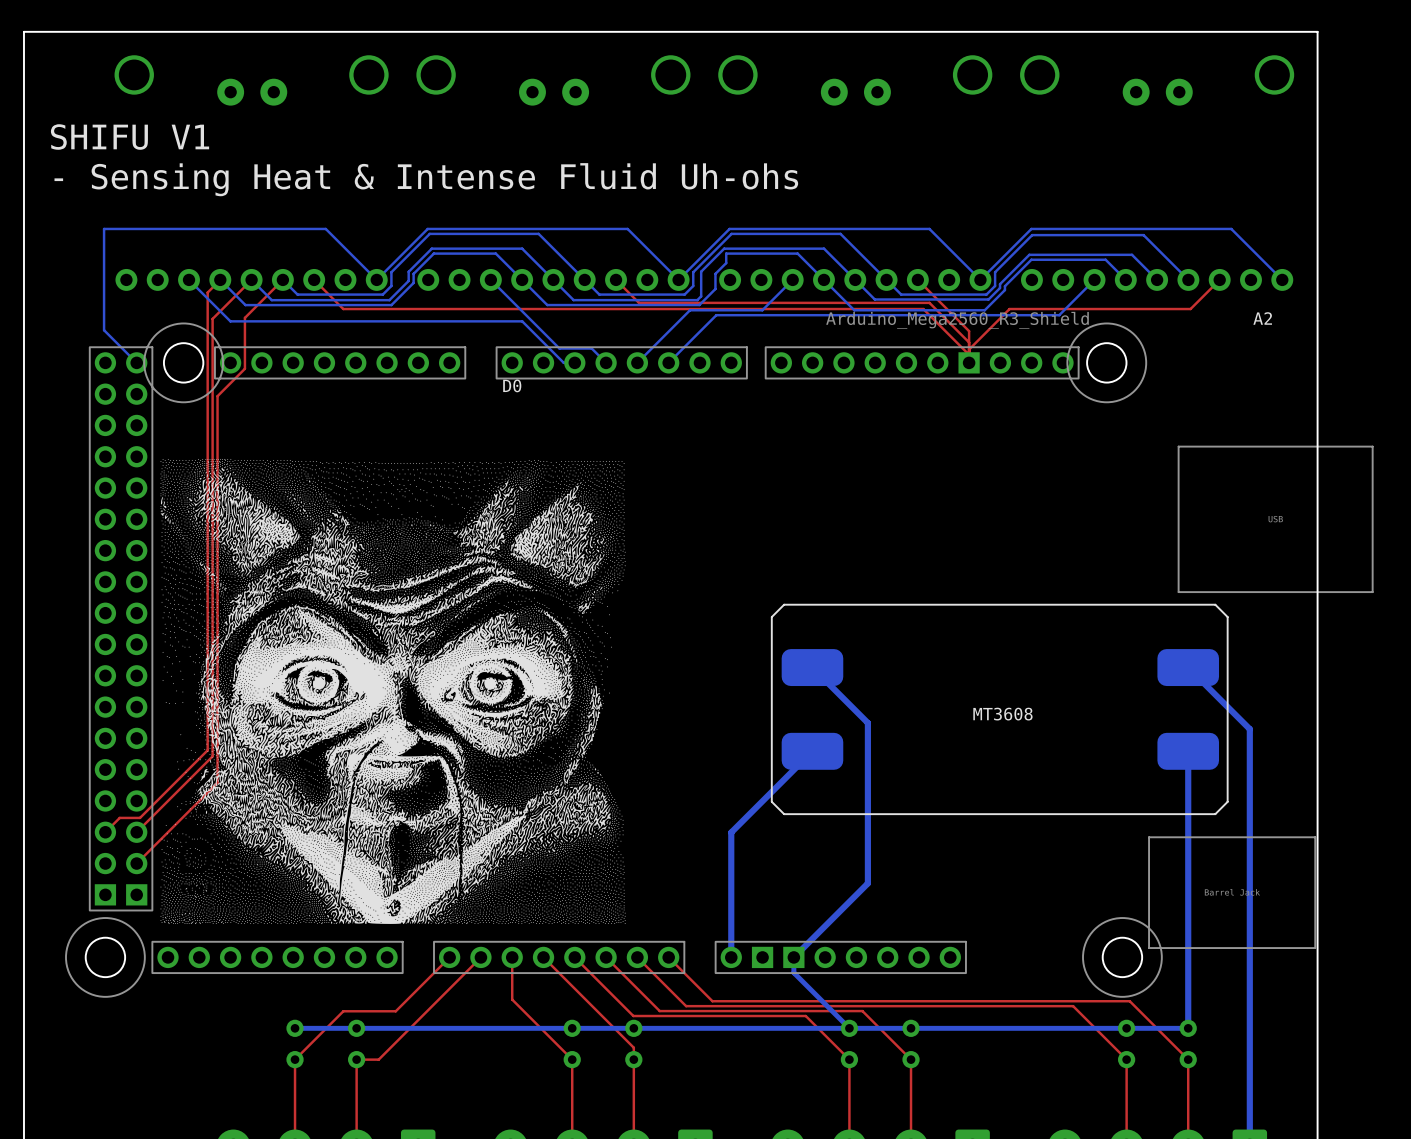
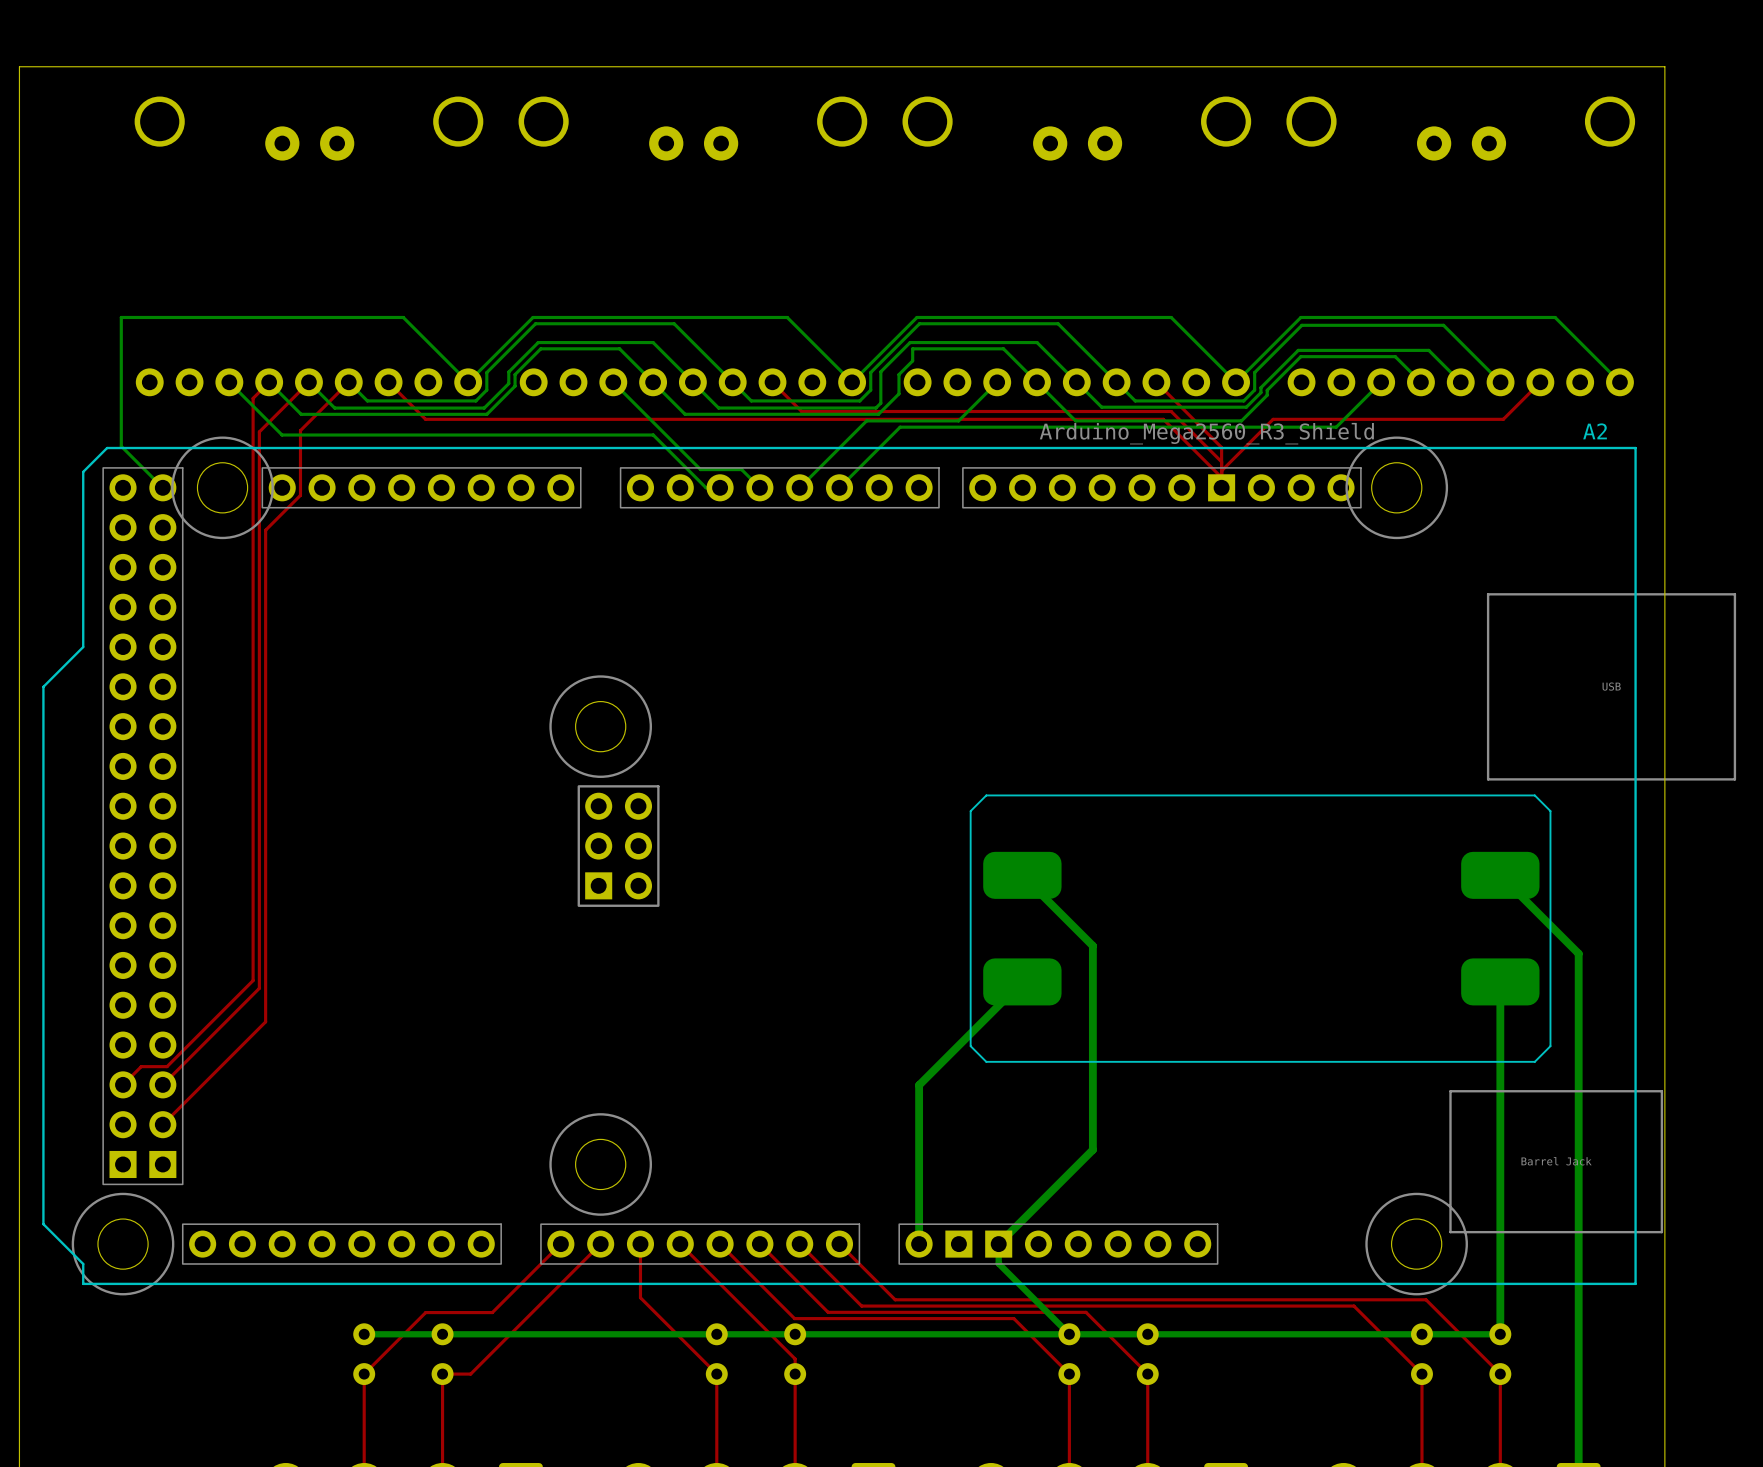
text: SHIFU V1 (130, 137) -> none
text: - Sensing Heat & Intense Fluid Uh-ohs (426, 179) -> none
A2 footprint: [65, 322, 1374, 998] -> [42, 436, 1737, 1296]
drawing: [160, 458, 626, 925] -> none
text: MT3608 (1002, 714) -> none

